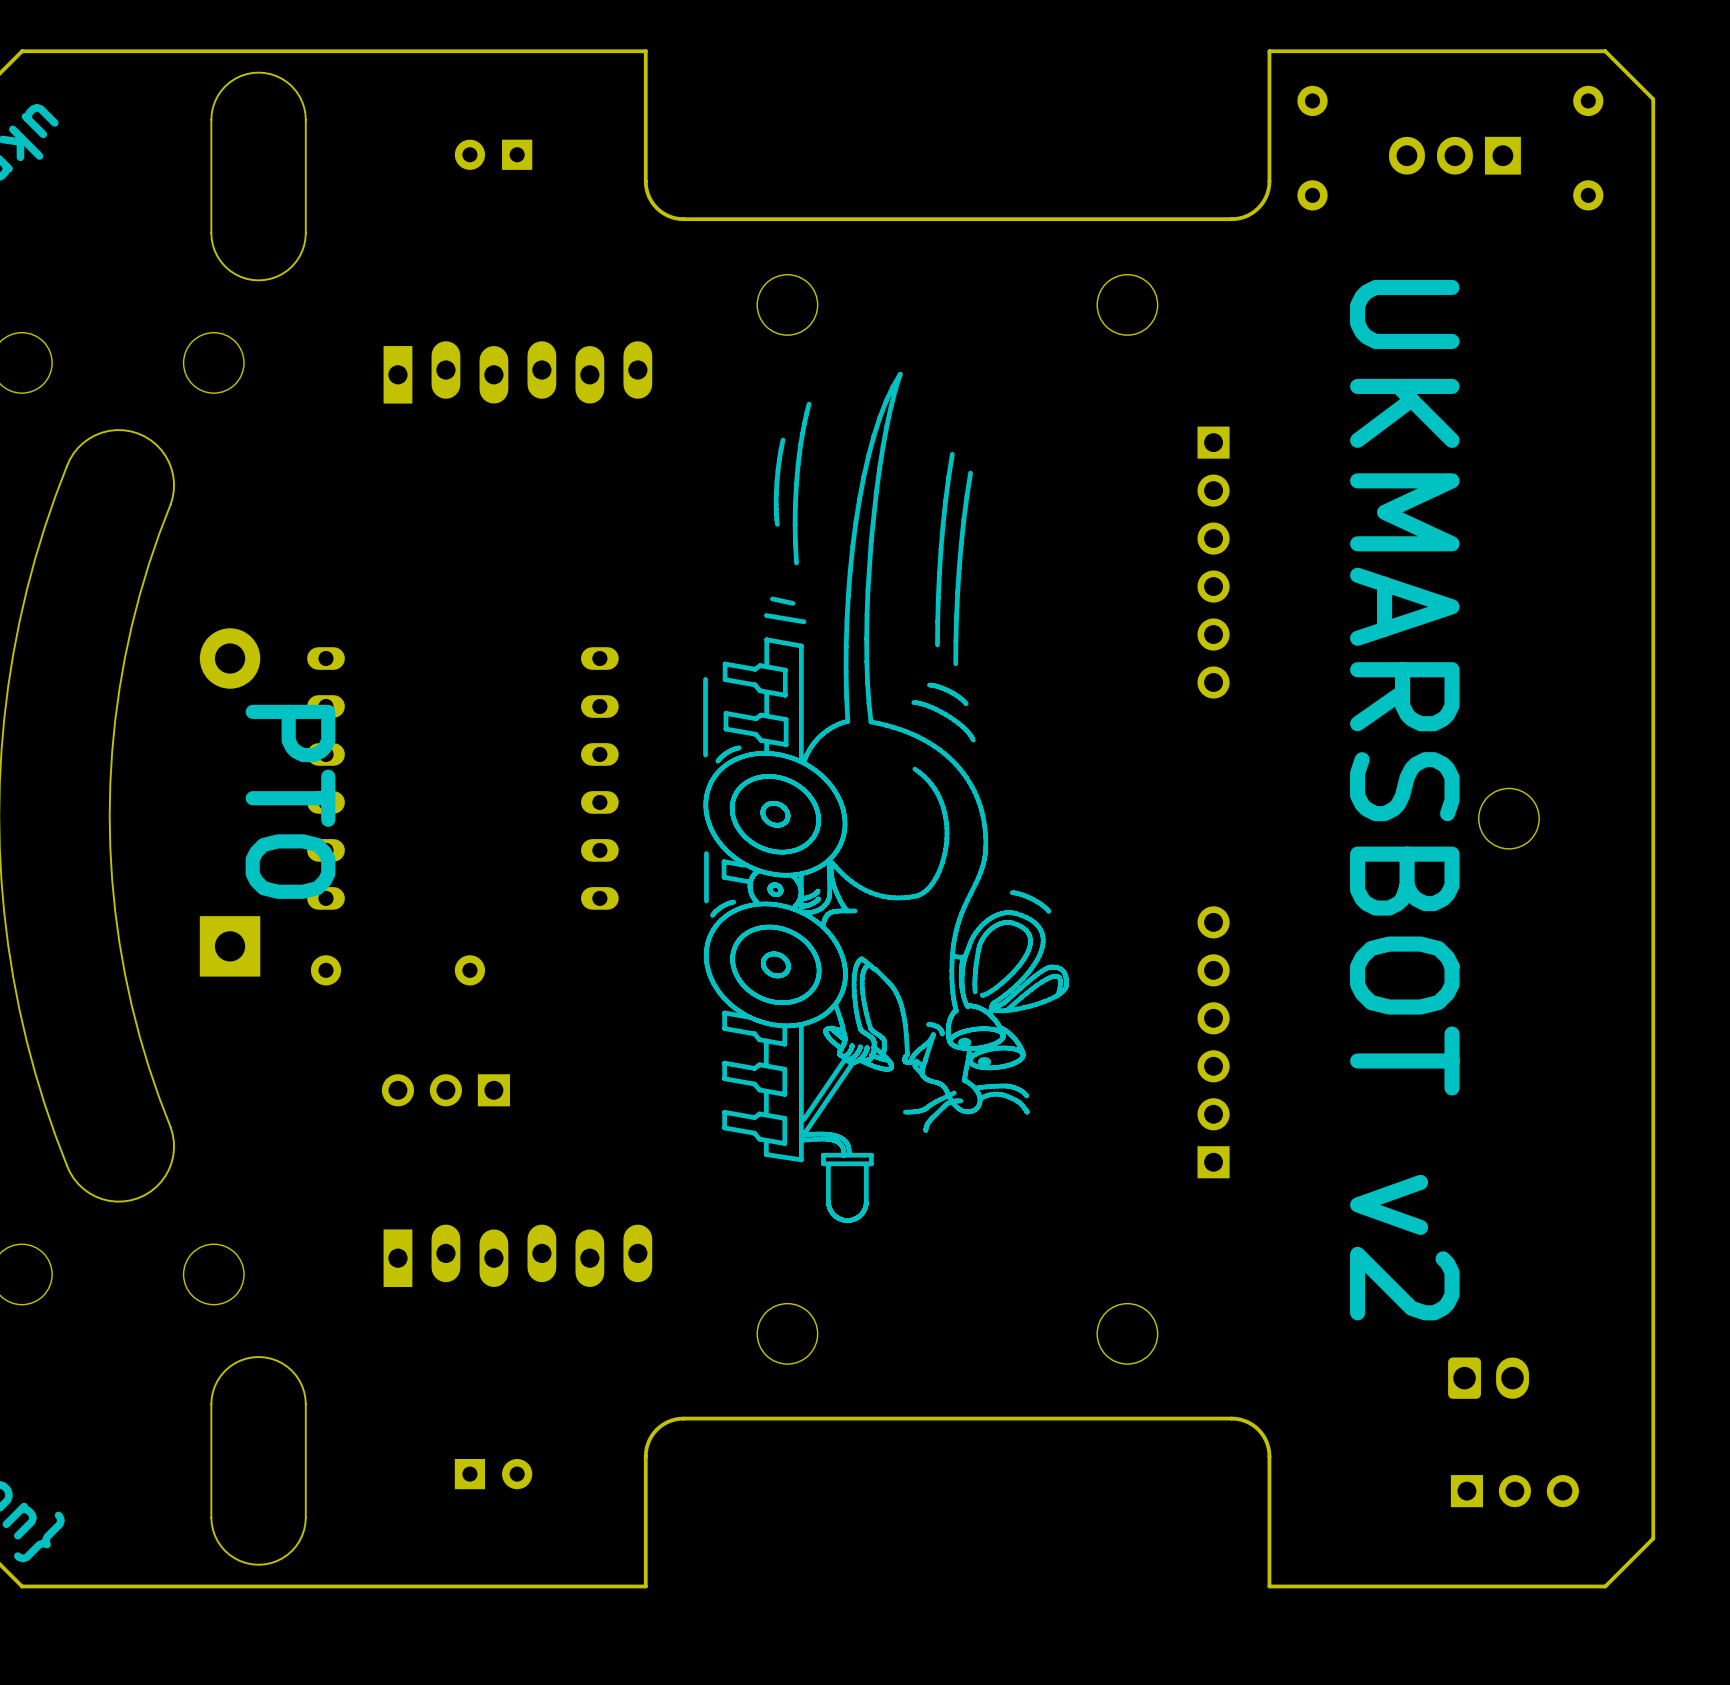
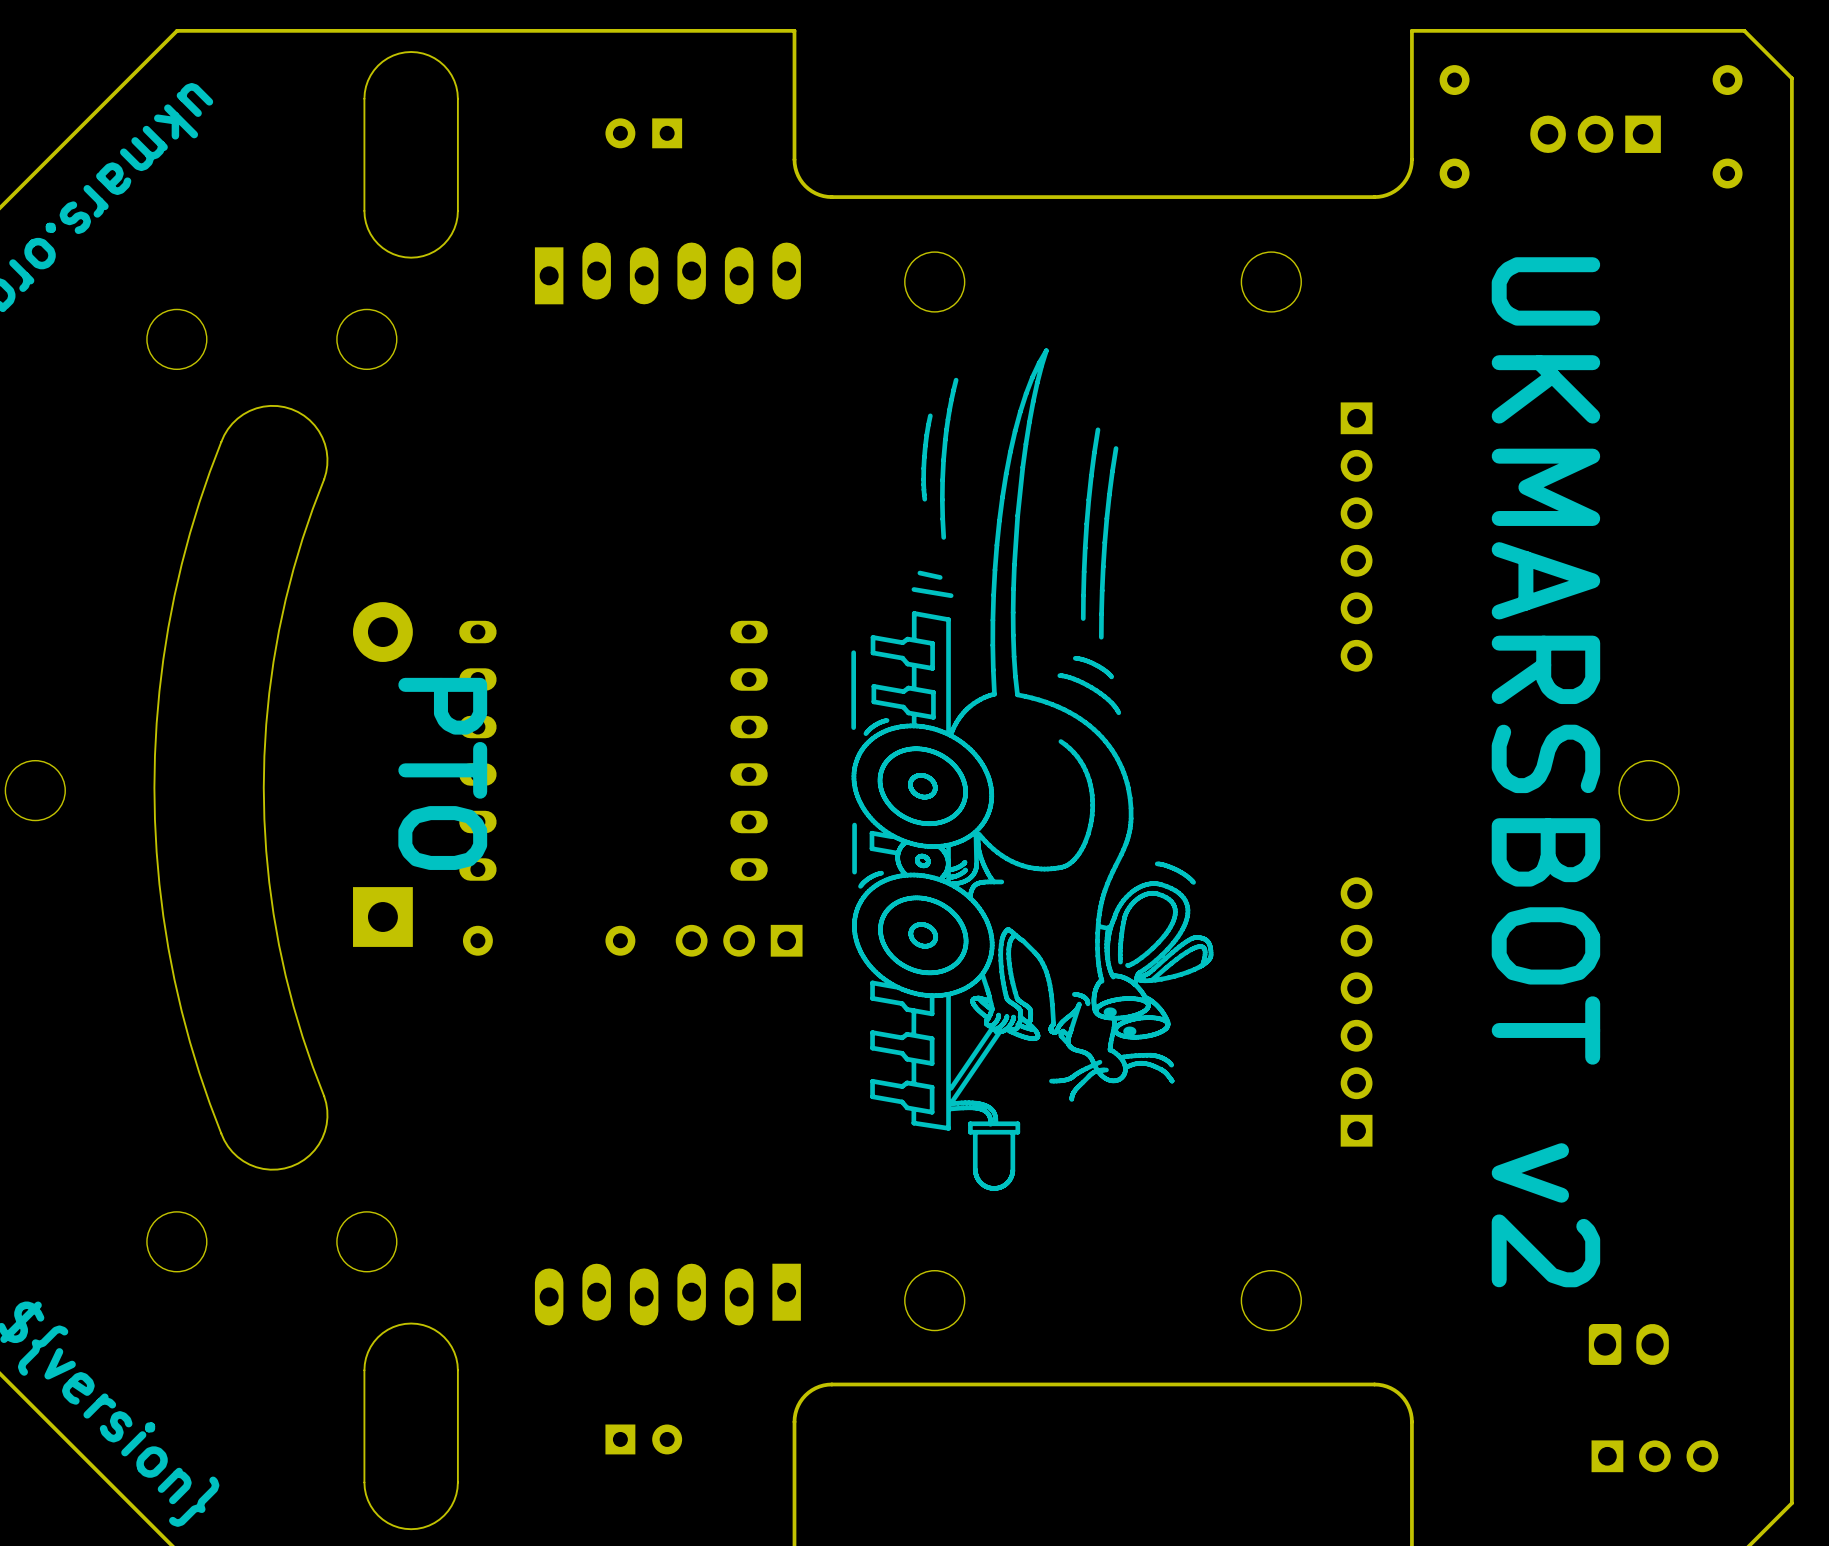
part position: (517, 372) -> (667, 273)
part position: (445, 1090) -> (739, 940)
part rotation: 0° (517, 1255) -> 180° (667, 1294)

